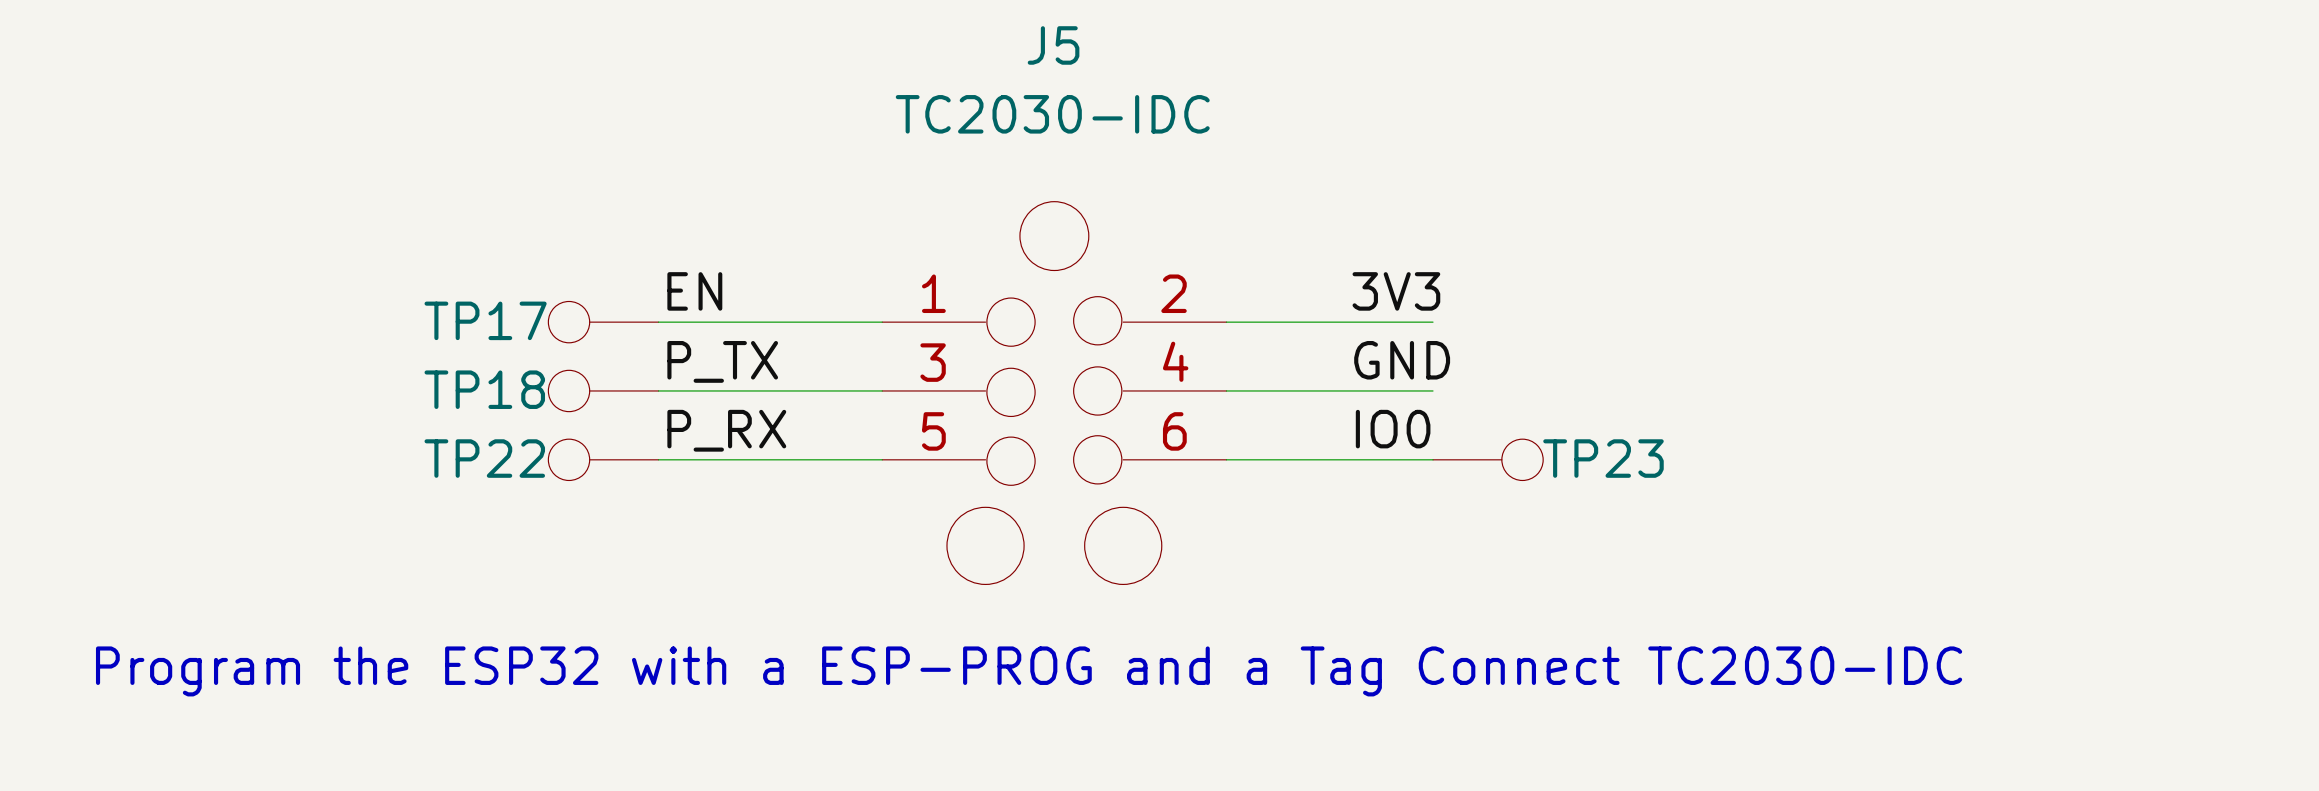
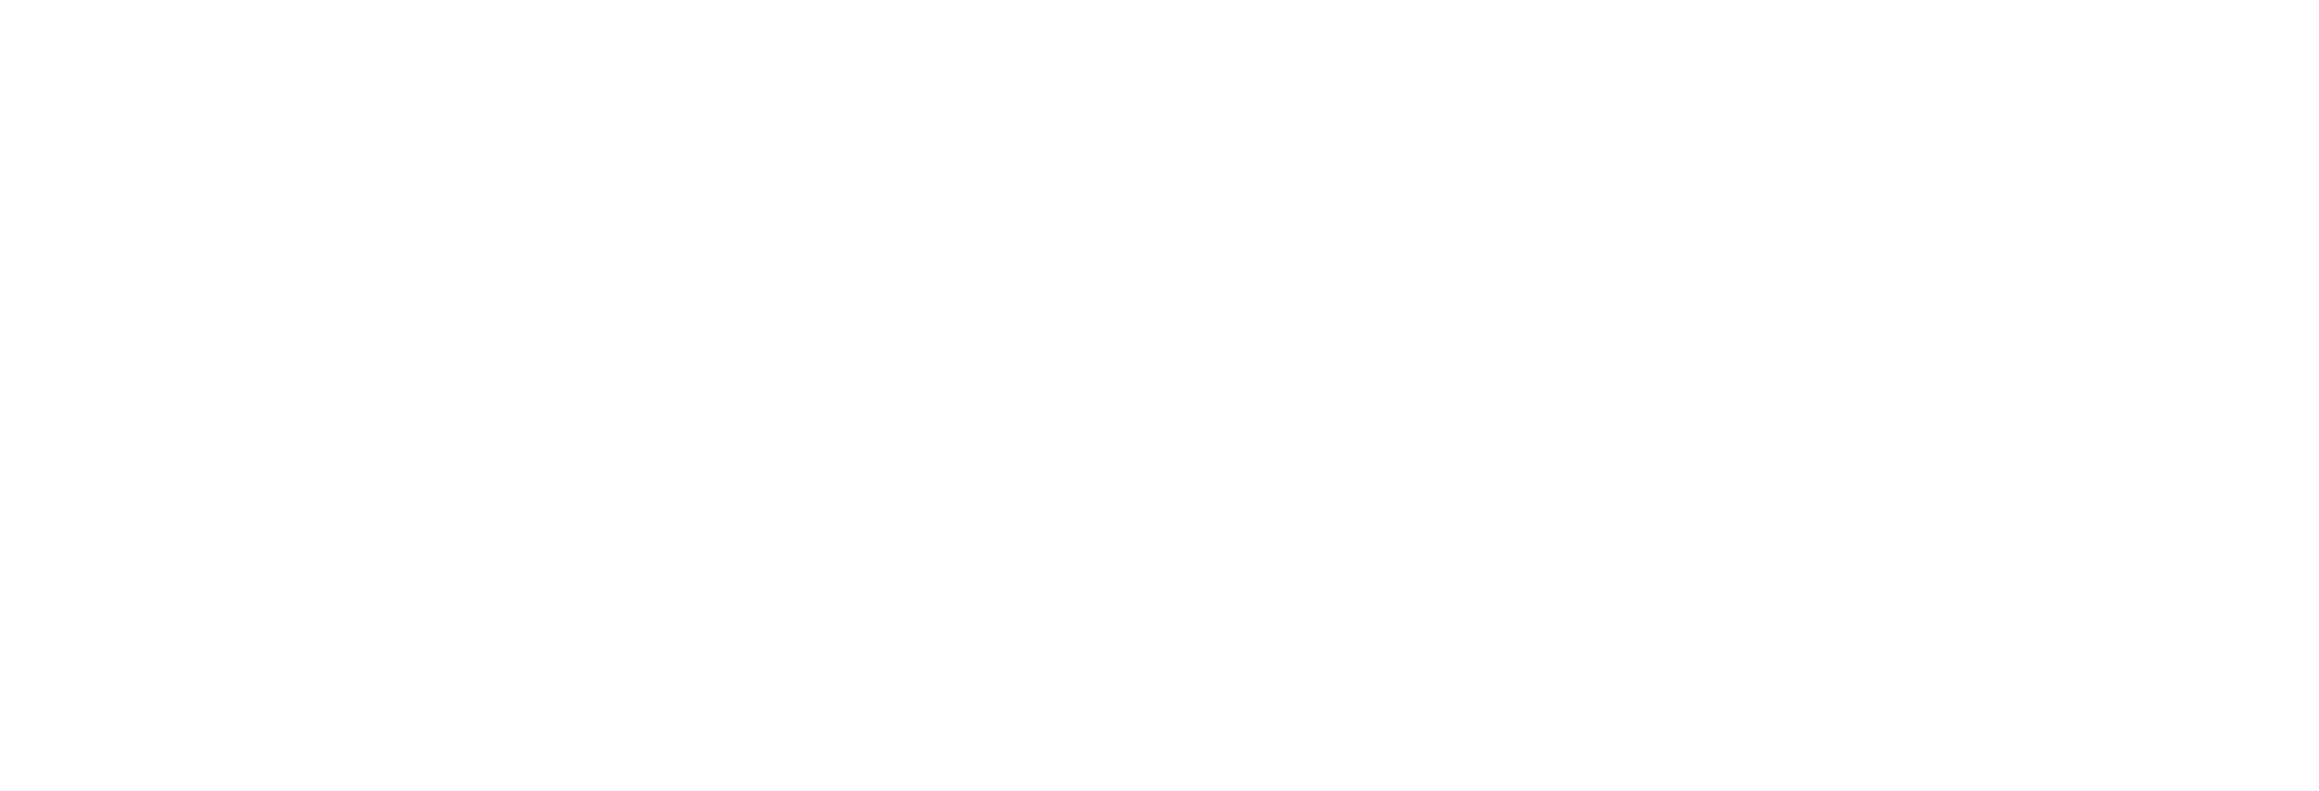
label: EN (694, 291) -> none
label: 3V3 (1396, 291) -> none
TP17: (603, 322) -> none
wire: (658, 322) (882, 322) -> none
wire: (1226, 322) (1433, 322) -> none
label: GND (1402, 360) -> none
label: P_TX (722, 361) -> none
TP18: (603, 390) -> none
wire: (658, 390) (882, 390) -> none
wire: (1226, 390) (1433, 390) -> none
J5: TC2030-IDC (1054, 393) -> none
label: IO0 (1393, 429) -> none
label: P_RX (726, 430) -> none
TP22: (603, 459) -> none
wire: (658, 459) (882, 459) -> none
wire: (1226, 459) (1433, 459) -> none
TP23: (1488, 459) -> none
text: Program the ESP32 with a ESP-PROG and a Tag Connect TC2030-IDC (1029, 671) -> none

